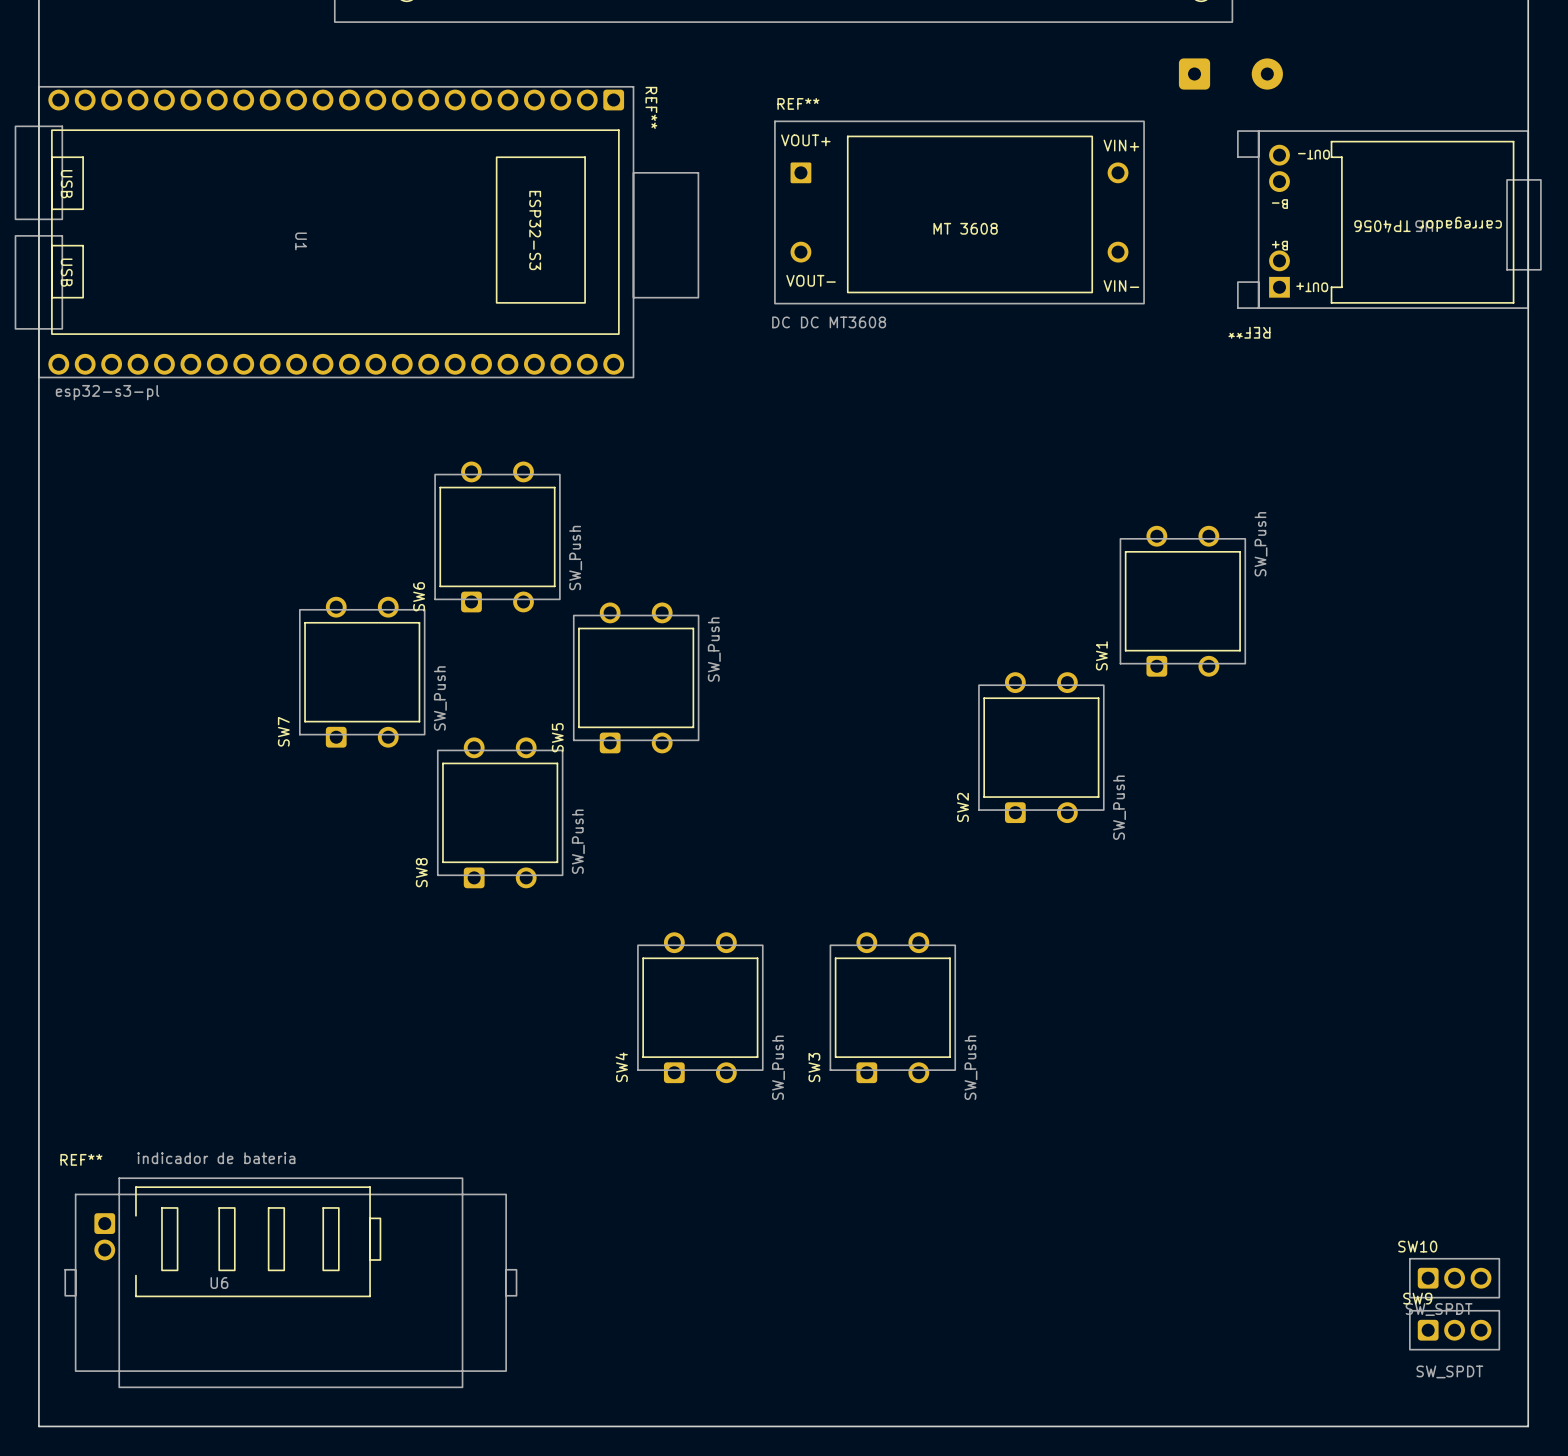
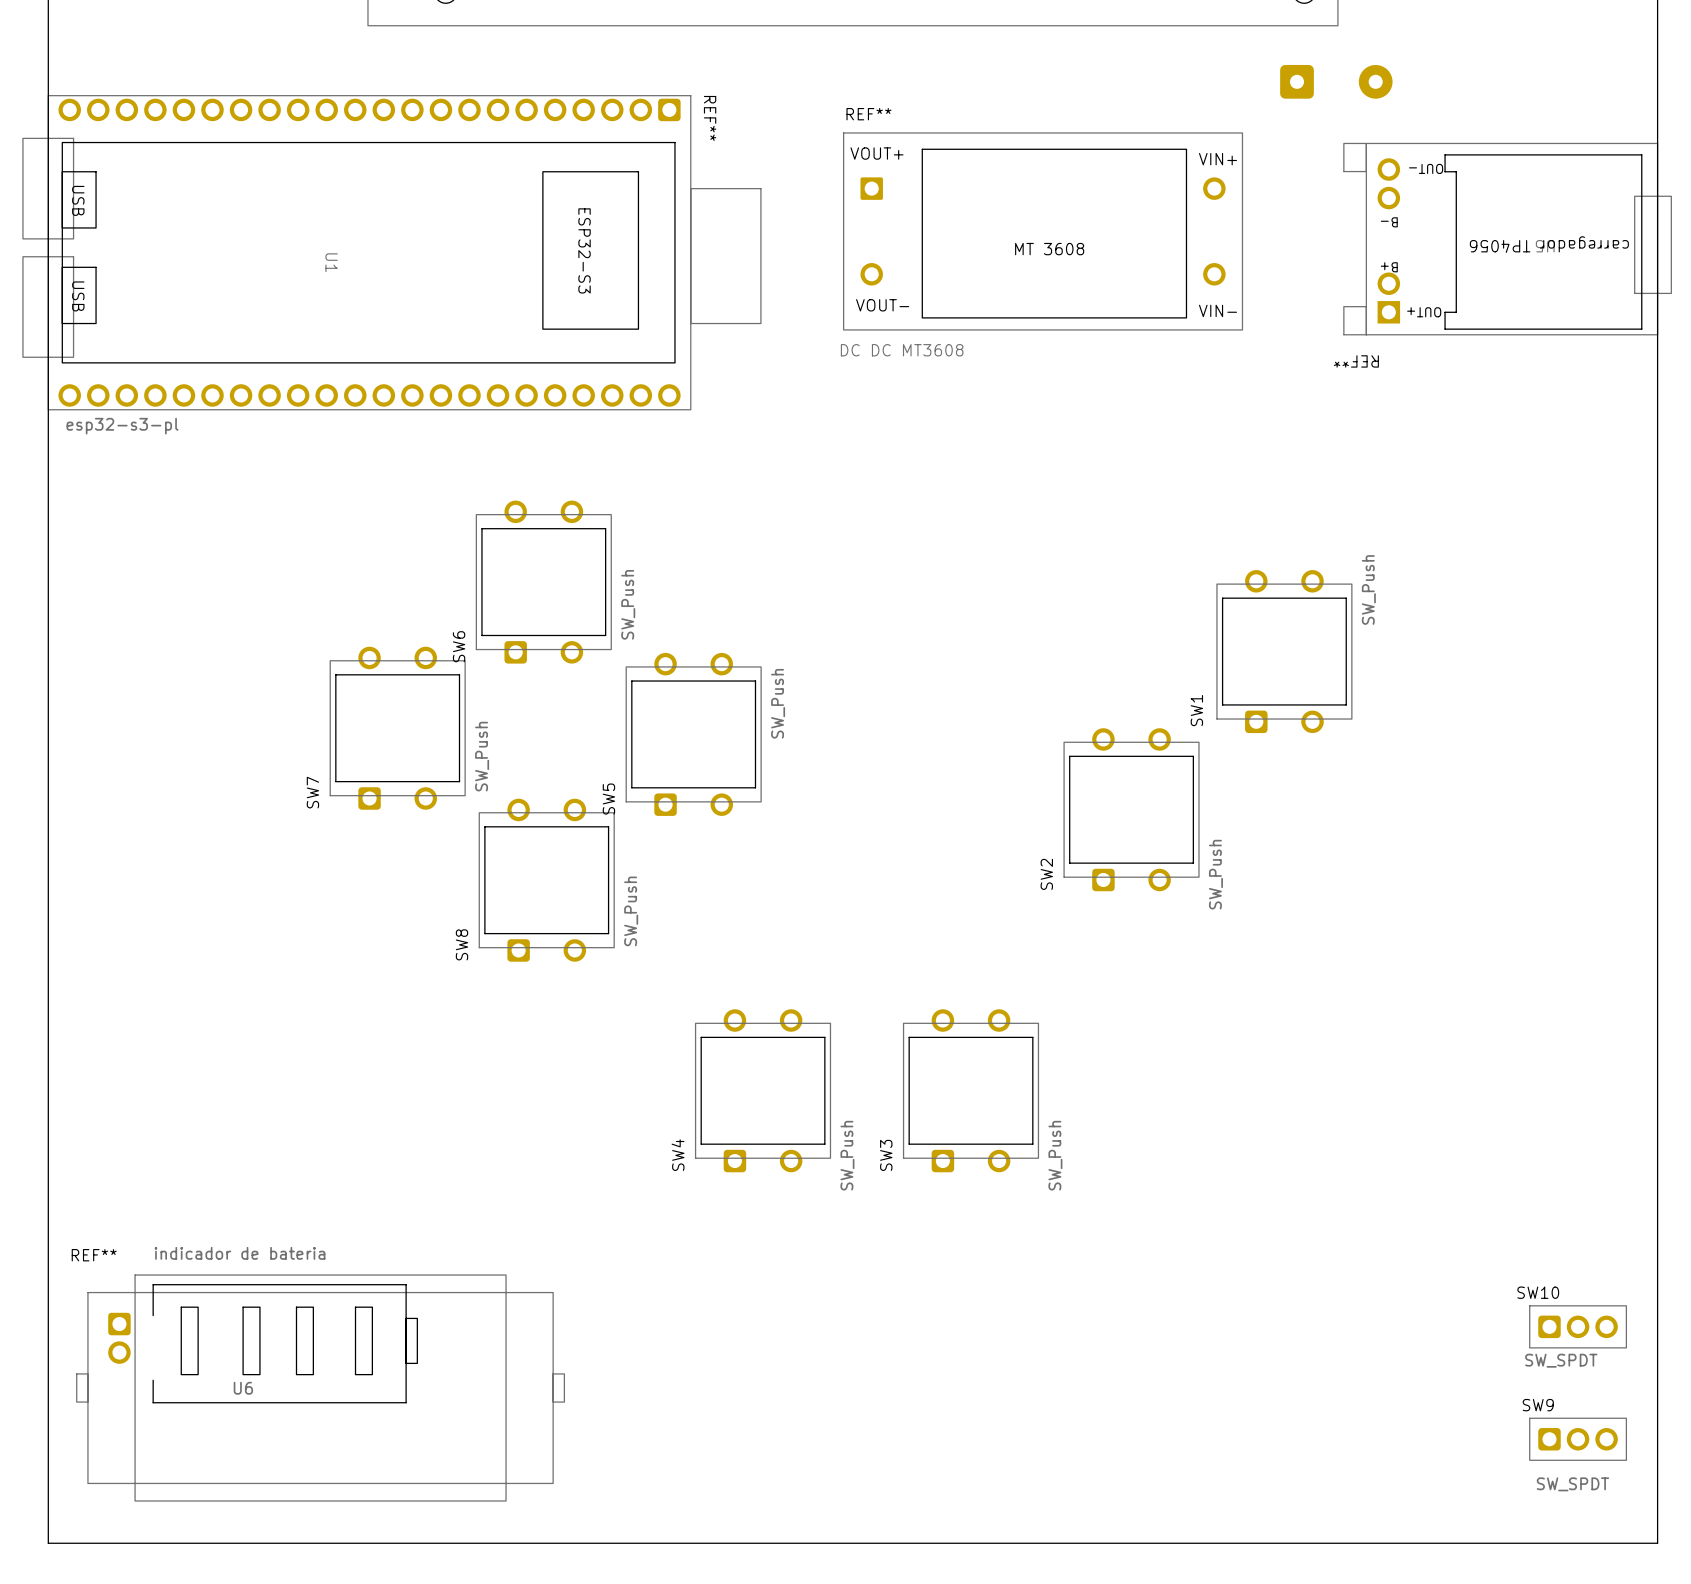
SW10 position: (1454, 1278) -> (1578, 1326)

